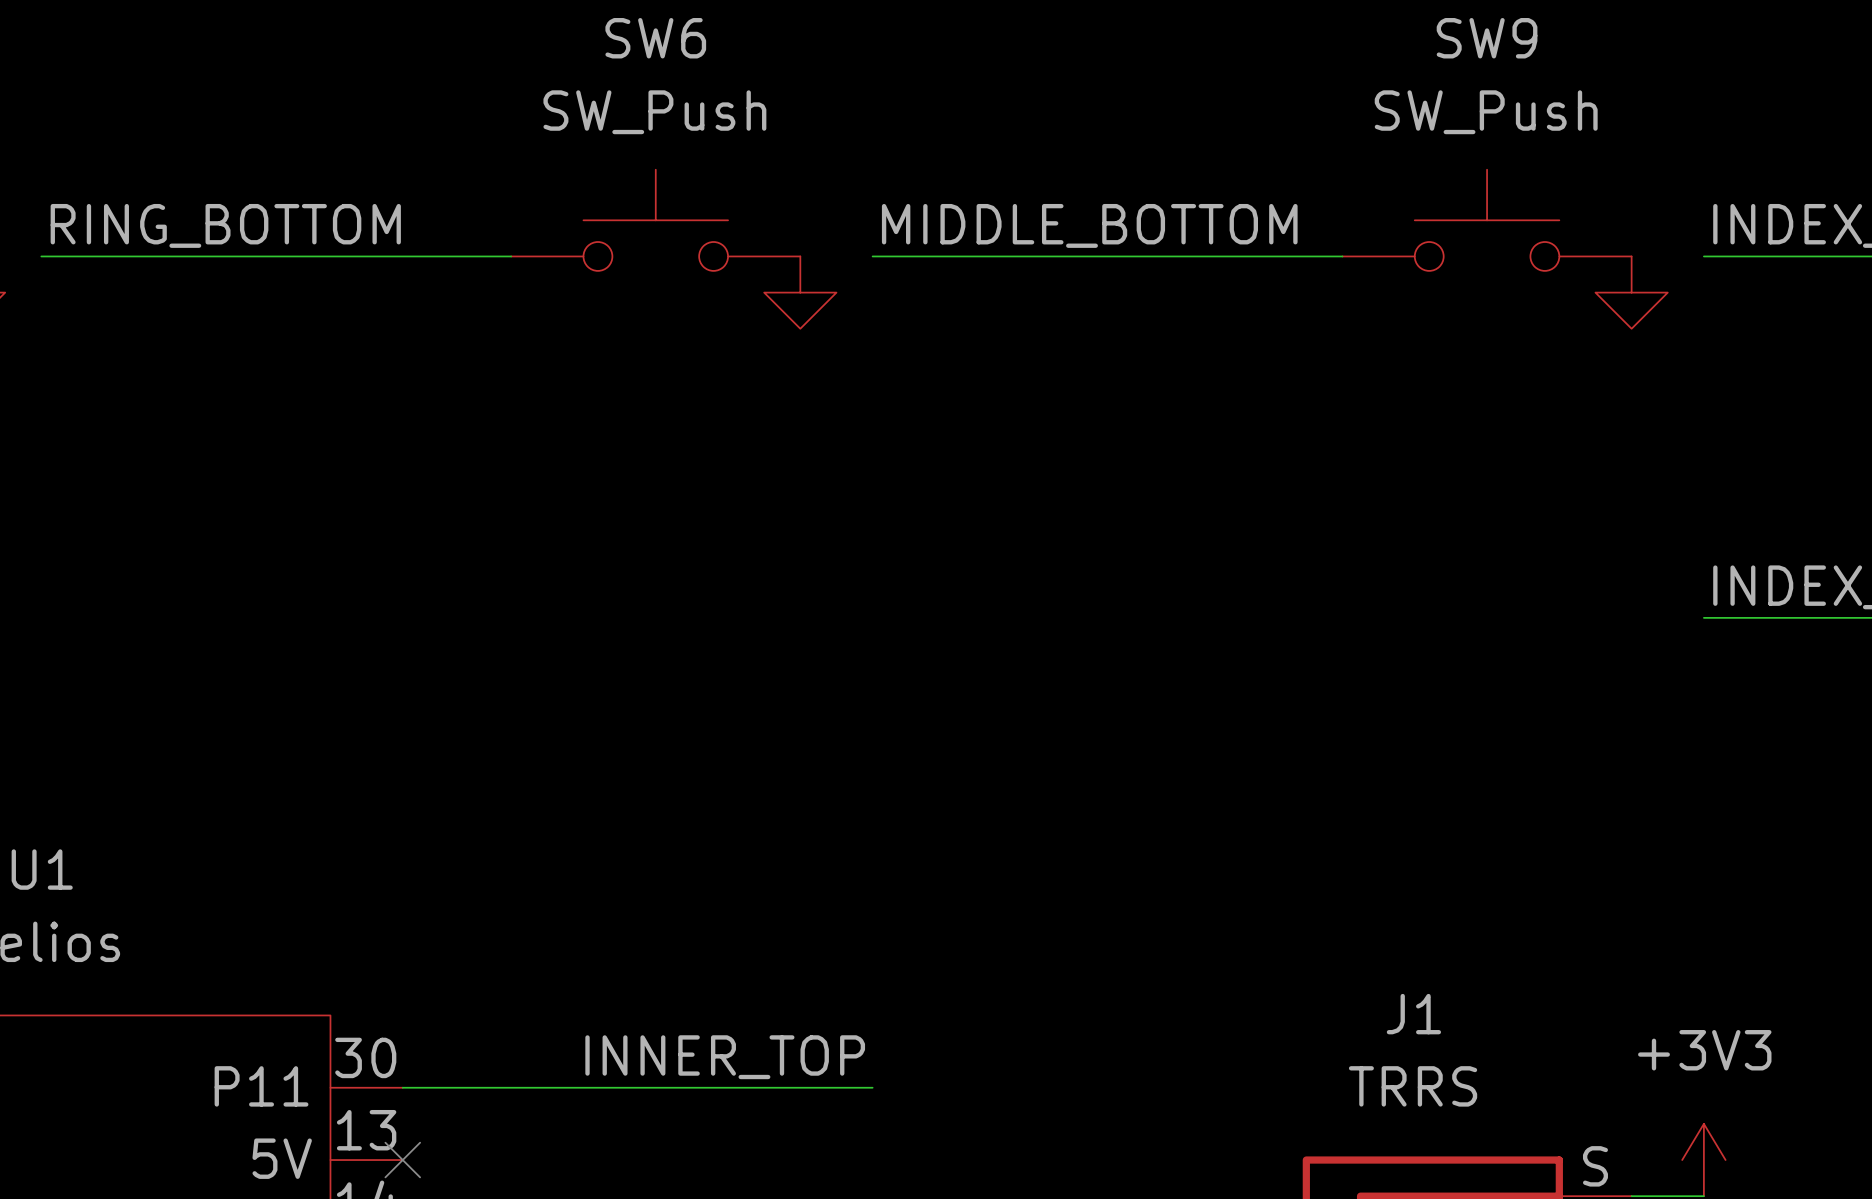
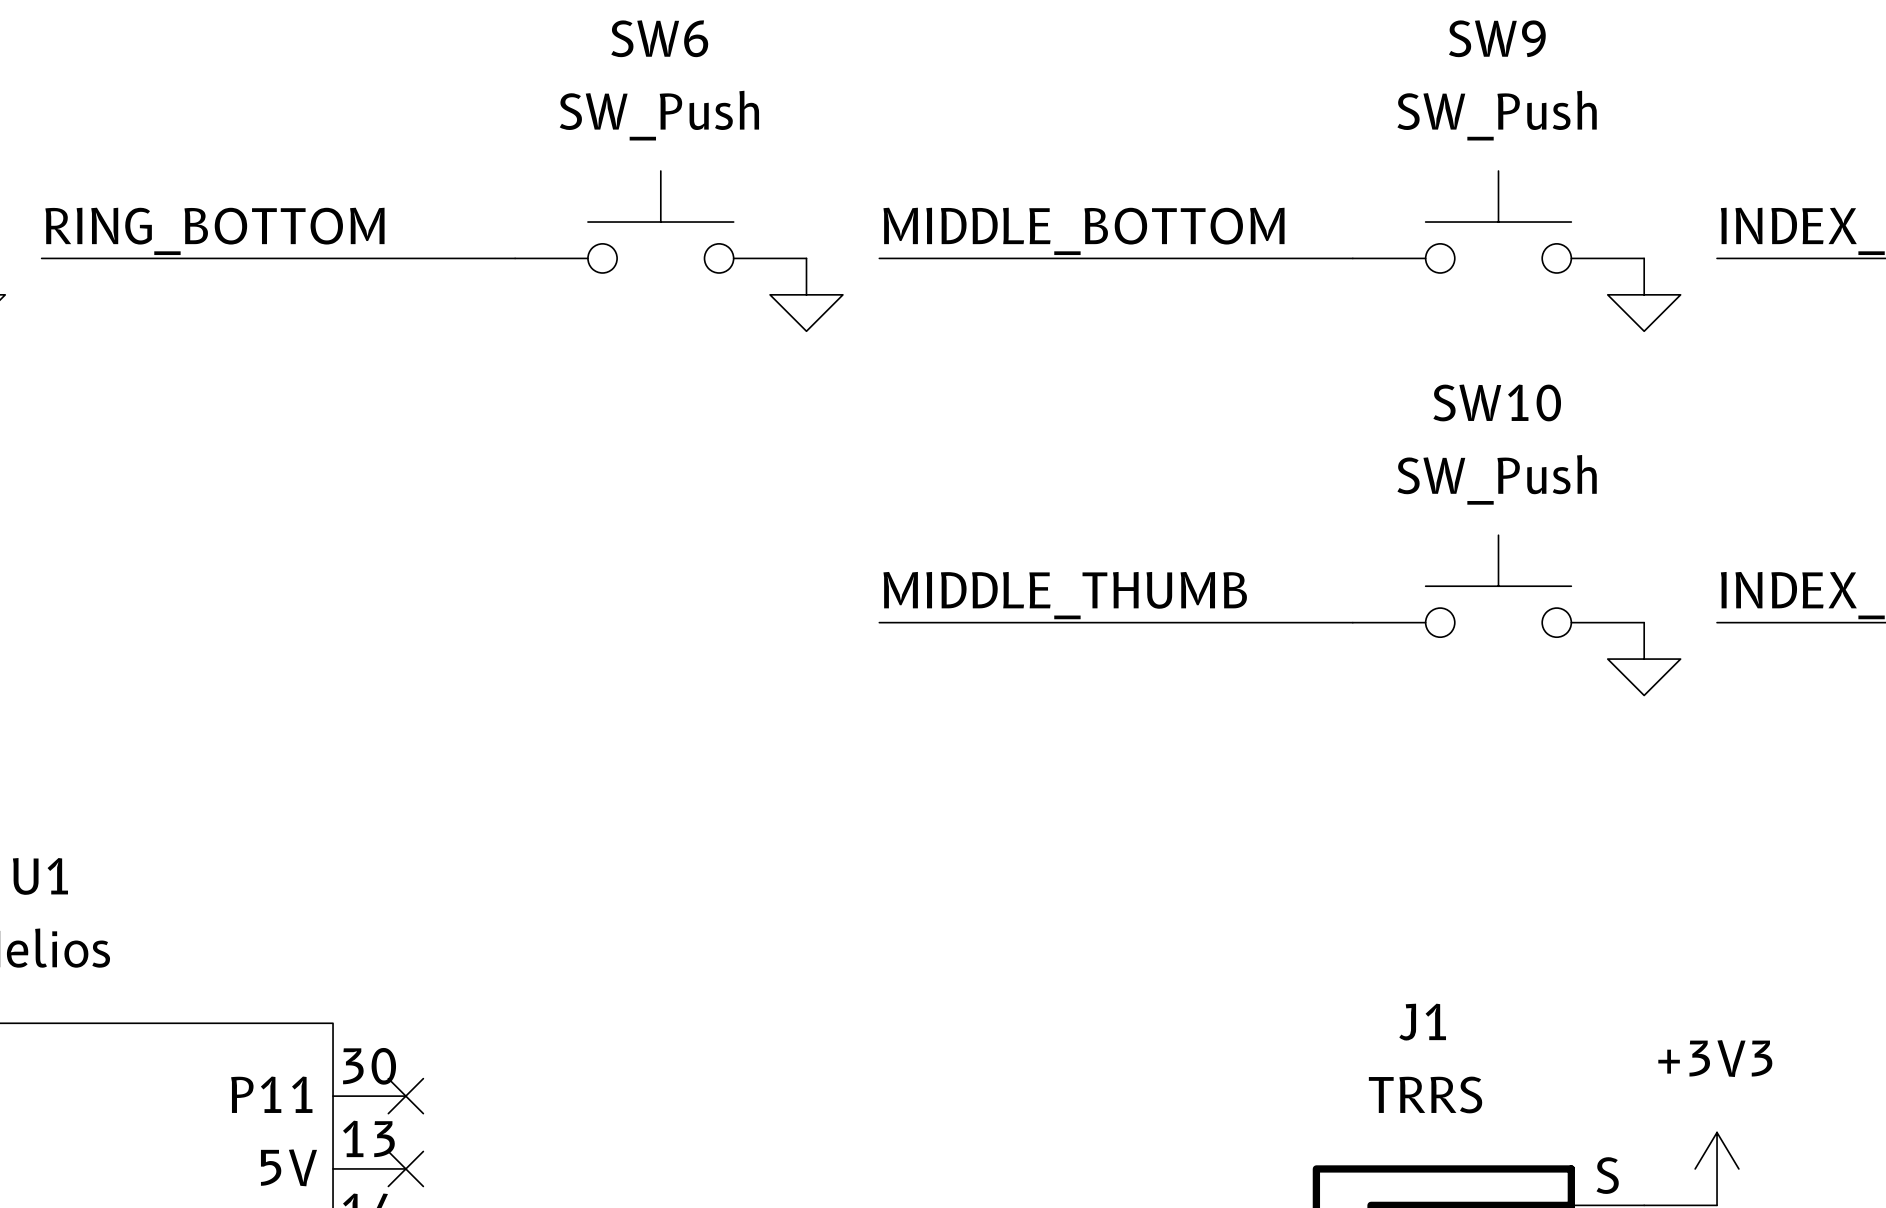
SW10: none -> SW_Push (1498, 586)
label: none -> MIDDLE_THUMB (1065, 595)
power symbol: none -> (1644, 659)
label: INNER_TOP (725, 1057) -> none
wire: (402, 1087) (872, 1087) -> (879, 622) (1352, 622)
no-connect mark: none -> (405, 1096)

